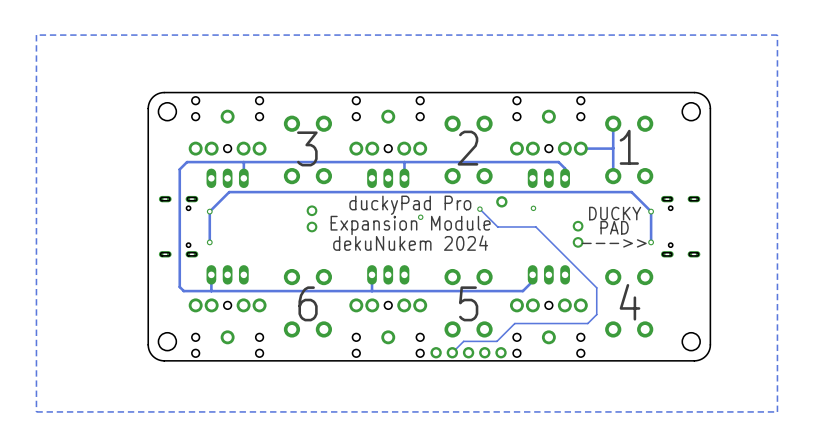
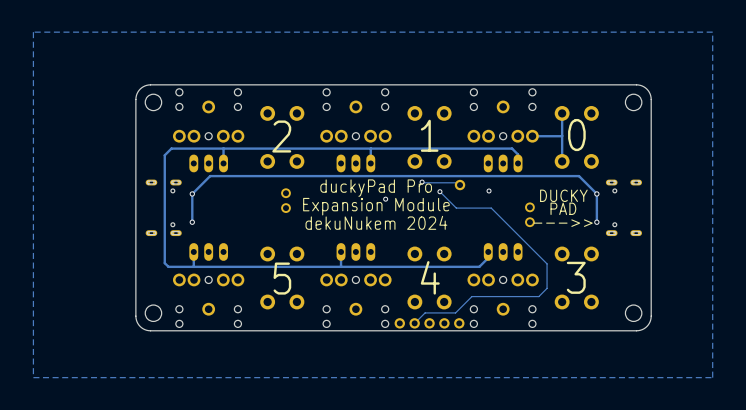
text: 1 (629, 147) -> 0 (576, 135)
text: 3 (307, 148) -> 2 (281, 136)
text: 2 (467, 148) -> 1 (429, 135)
track: none -> (422, 182) (457, 182) (460, 185)
via: none -> (422, 182)
text: 4 (630, 302) -> 3 (576, 277)
text: 6 (308, 303) -> 5 (282, 278)
text: 5 (468, 303) -> 4 (430, 277)

